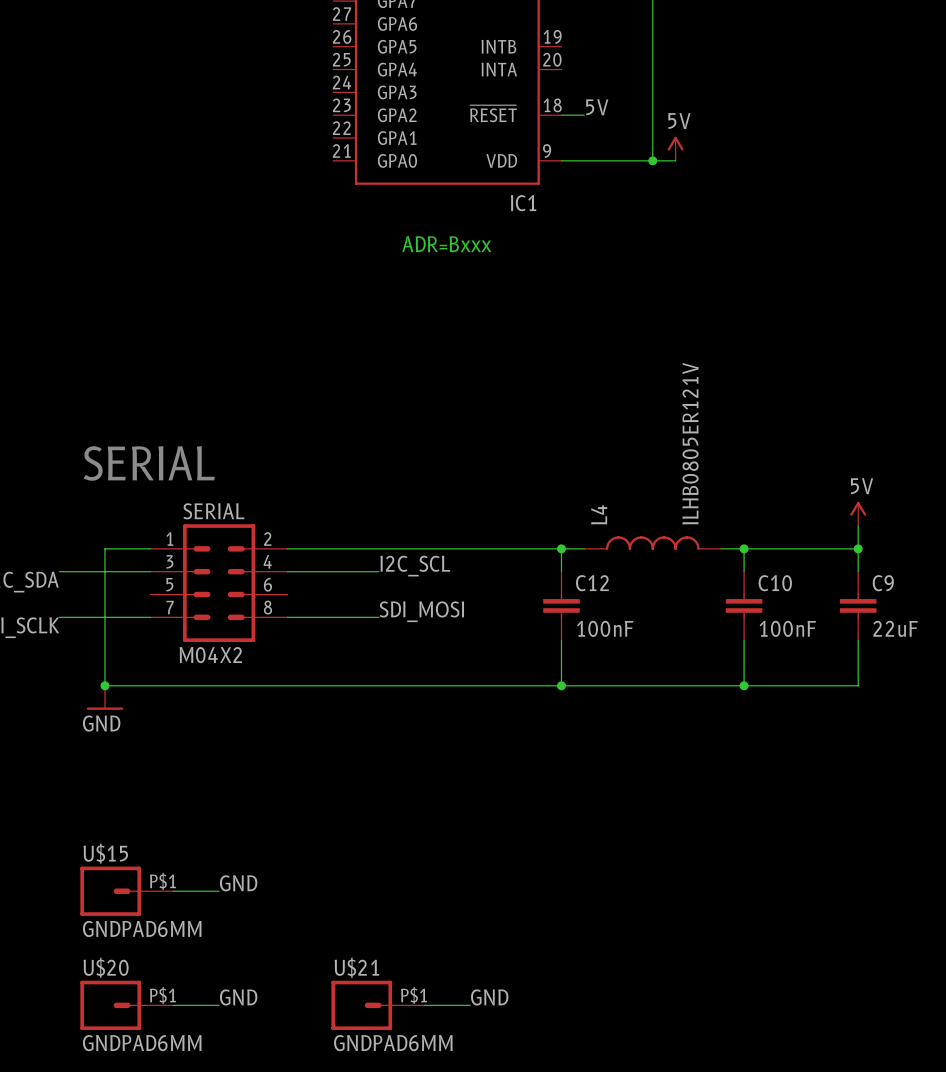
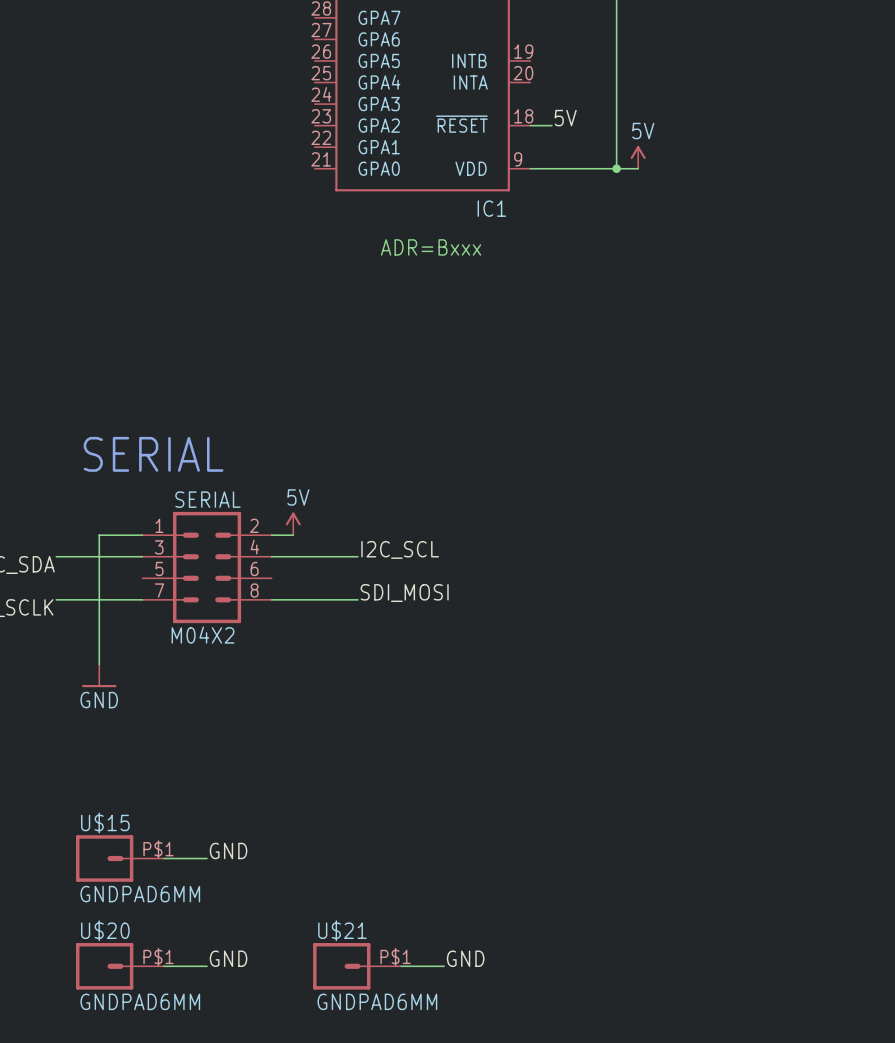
power symbol: 5V (858, 514) -> none
wire: (858, 526) (858, 571) -> none
power symbol: none -> 5V (293, 523)
L4: ILHB0805ER121V (652, 543) -> none
wire: (310, 548) (584, 548) -> none
wire: (561, 548) (561, 571) -> none
junction: (561, 548) -> none
wire: (721, 548) (858, 548) -> none
wire: (744, 548) (744, 571) -> none
junction: (744, 548) -> none
junction: (858, 548) -> none
C12: 100nF (561, 605) -> none
C10: 100nF (744, 605) -> none
C9: 22uF (858, 605) -> none
wire: (561, 640) (561, 685) -> none
wire: (744, 640) (744, 685) -> none
wire: (858, 640) (858, 685) (104, 685) -> none
junction: (104, 685) -> none
junction: (561, 685) -> none
junction: (744, 685) -> none

